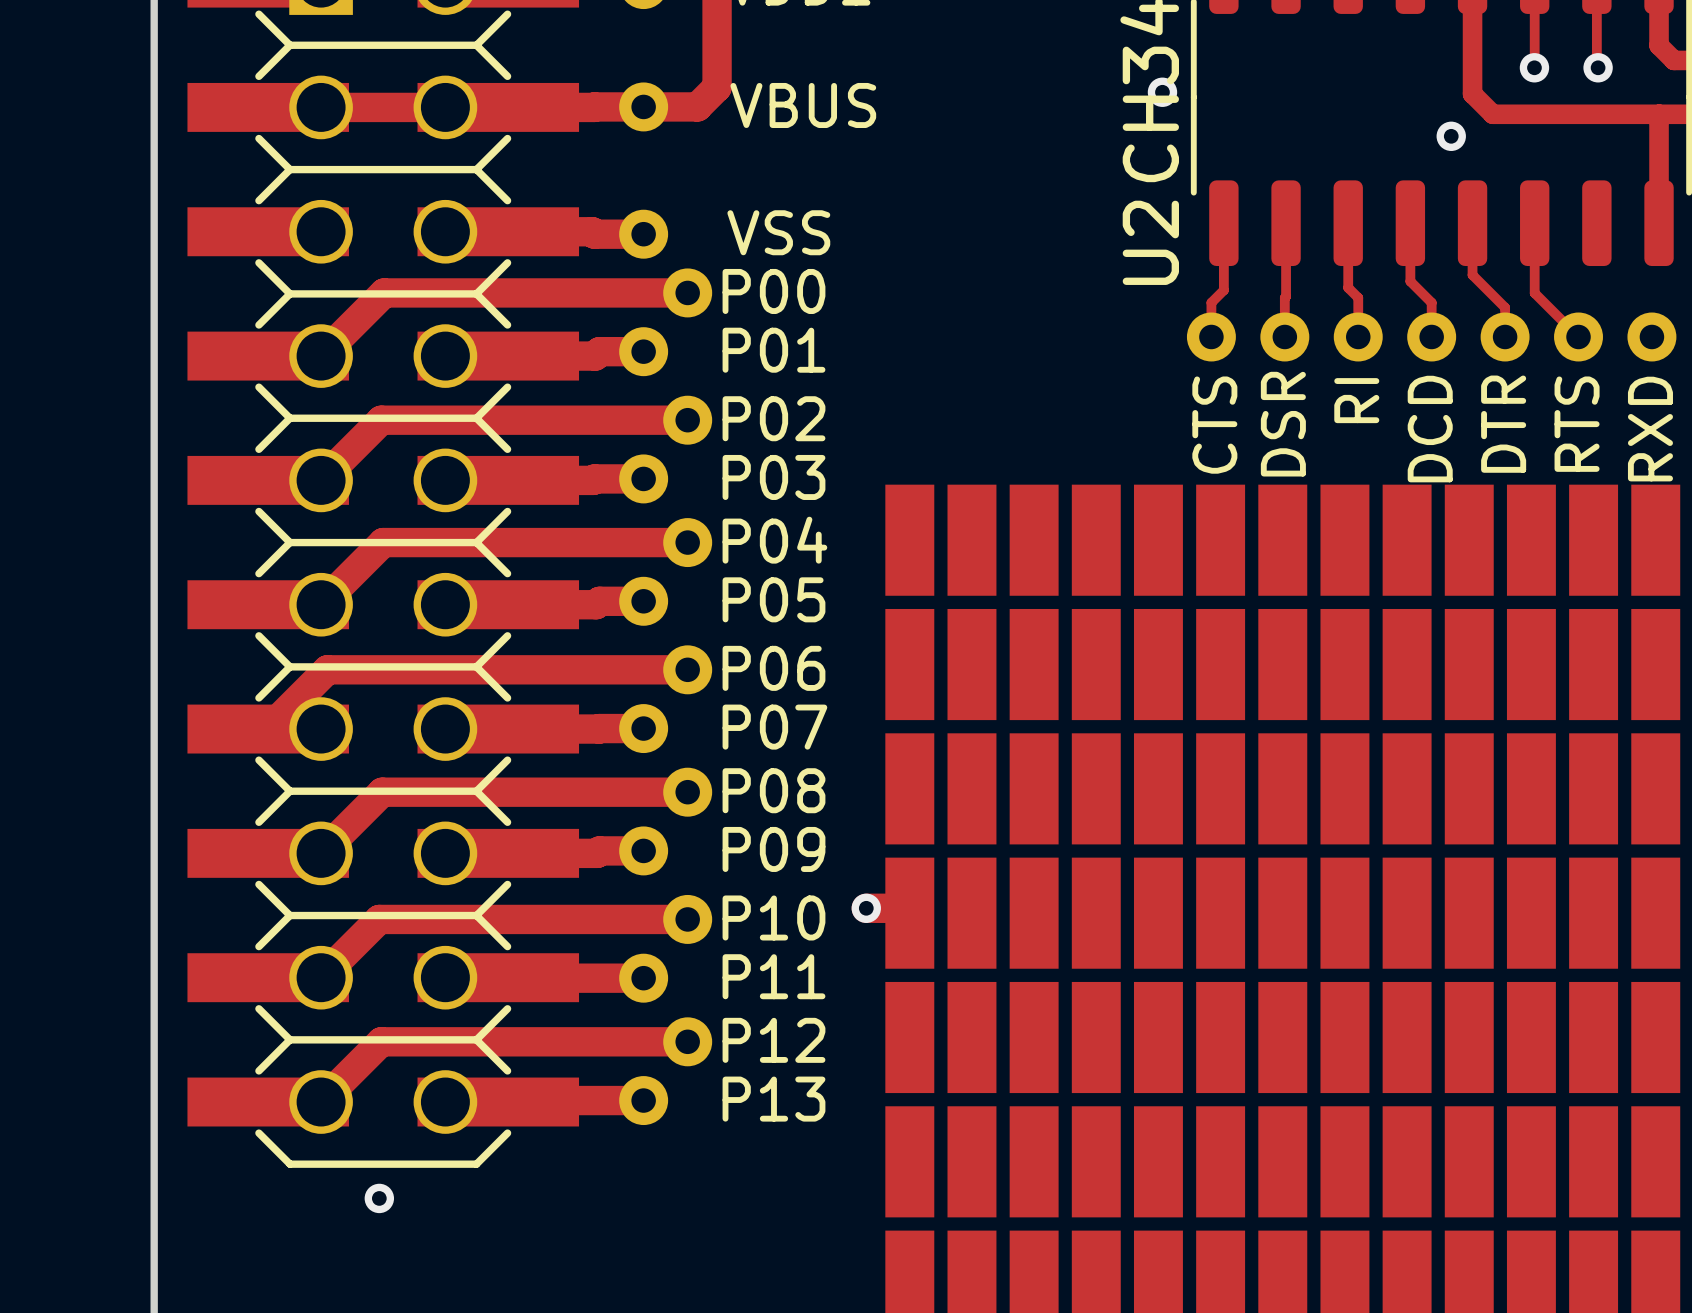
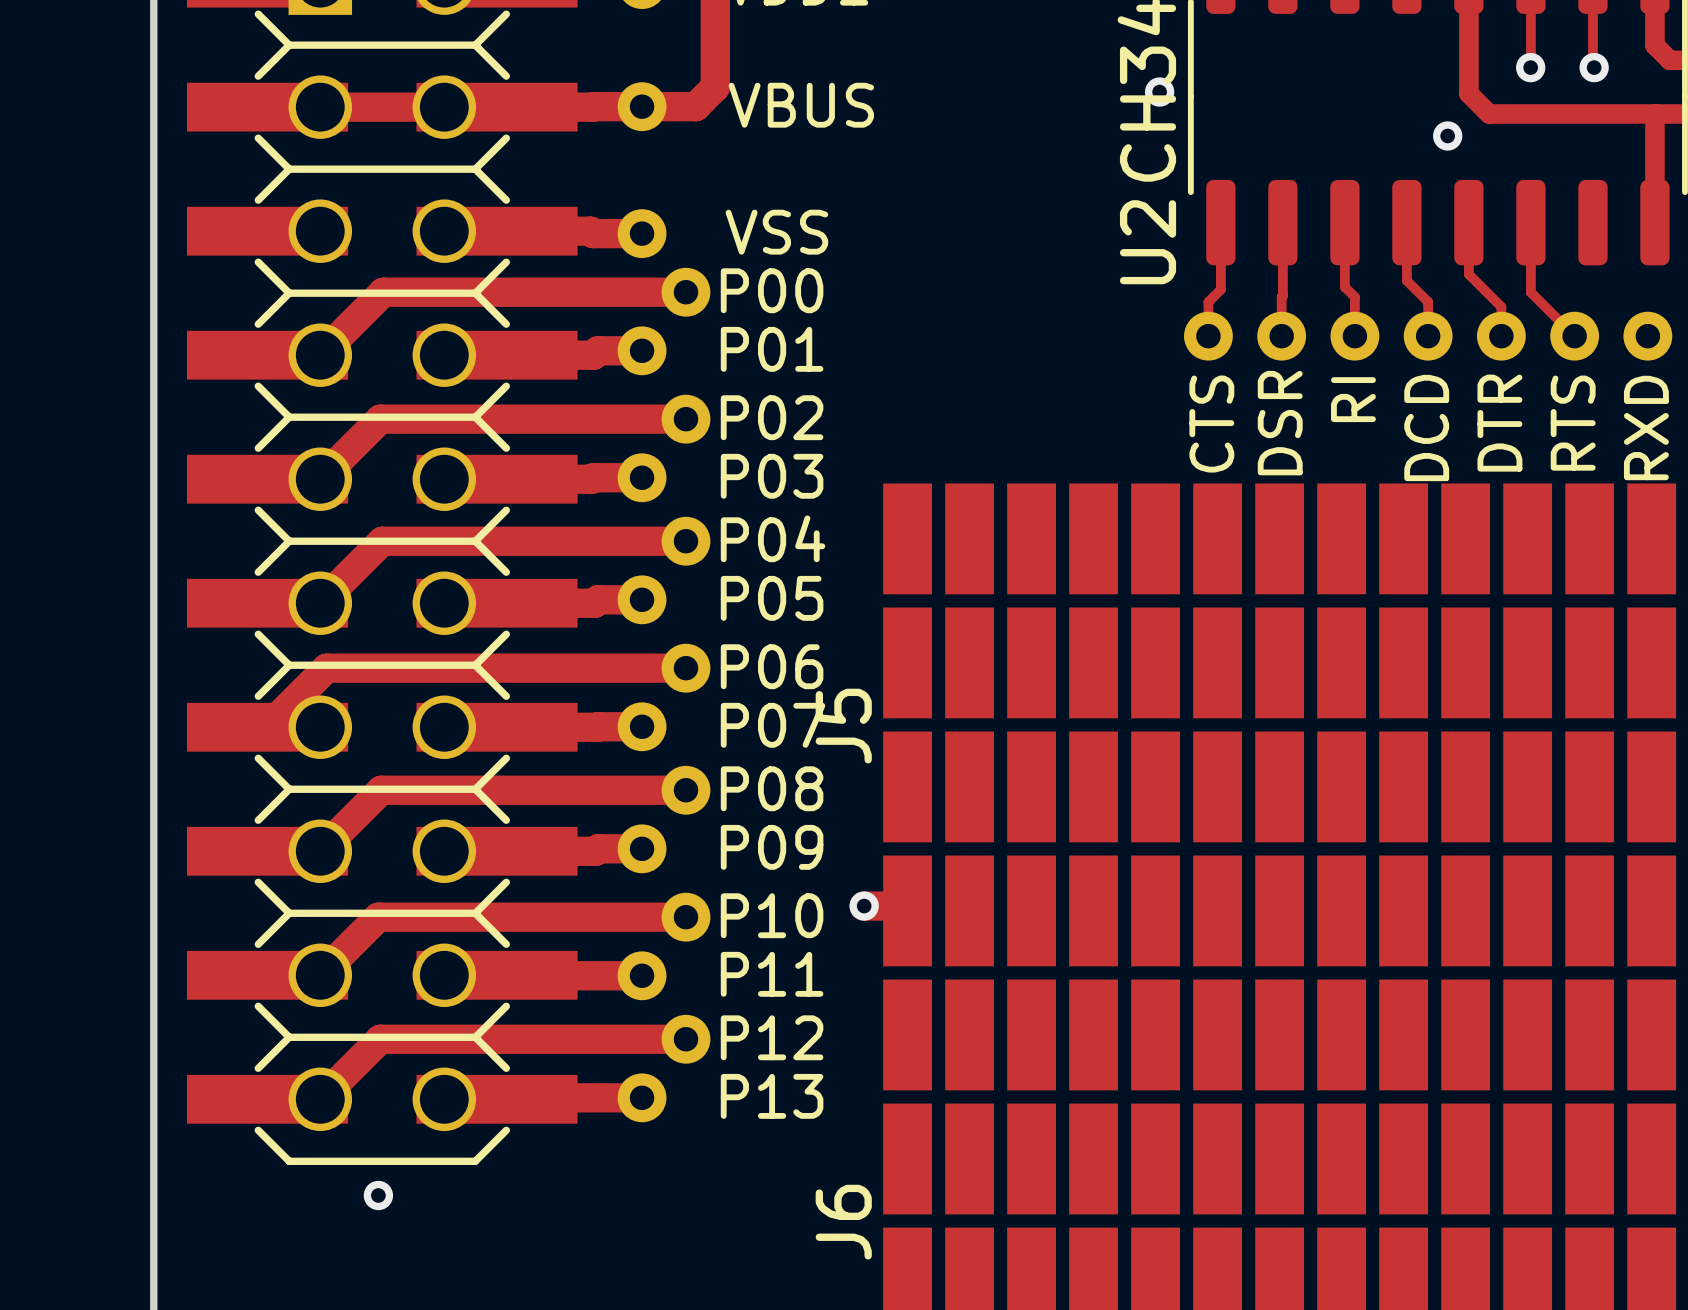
J5 name: none -> J5 (843, 726)
J6 name: none -> J6 (843, 1222)

